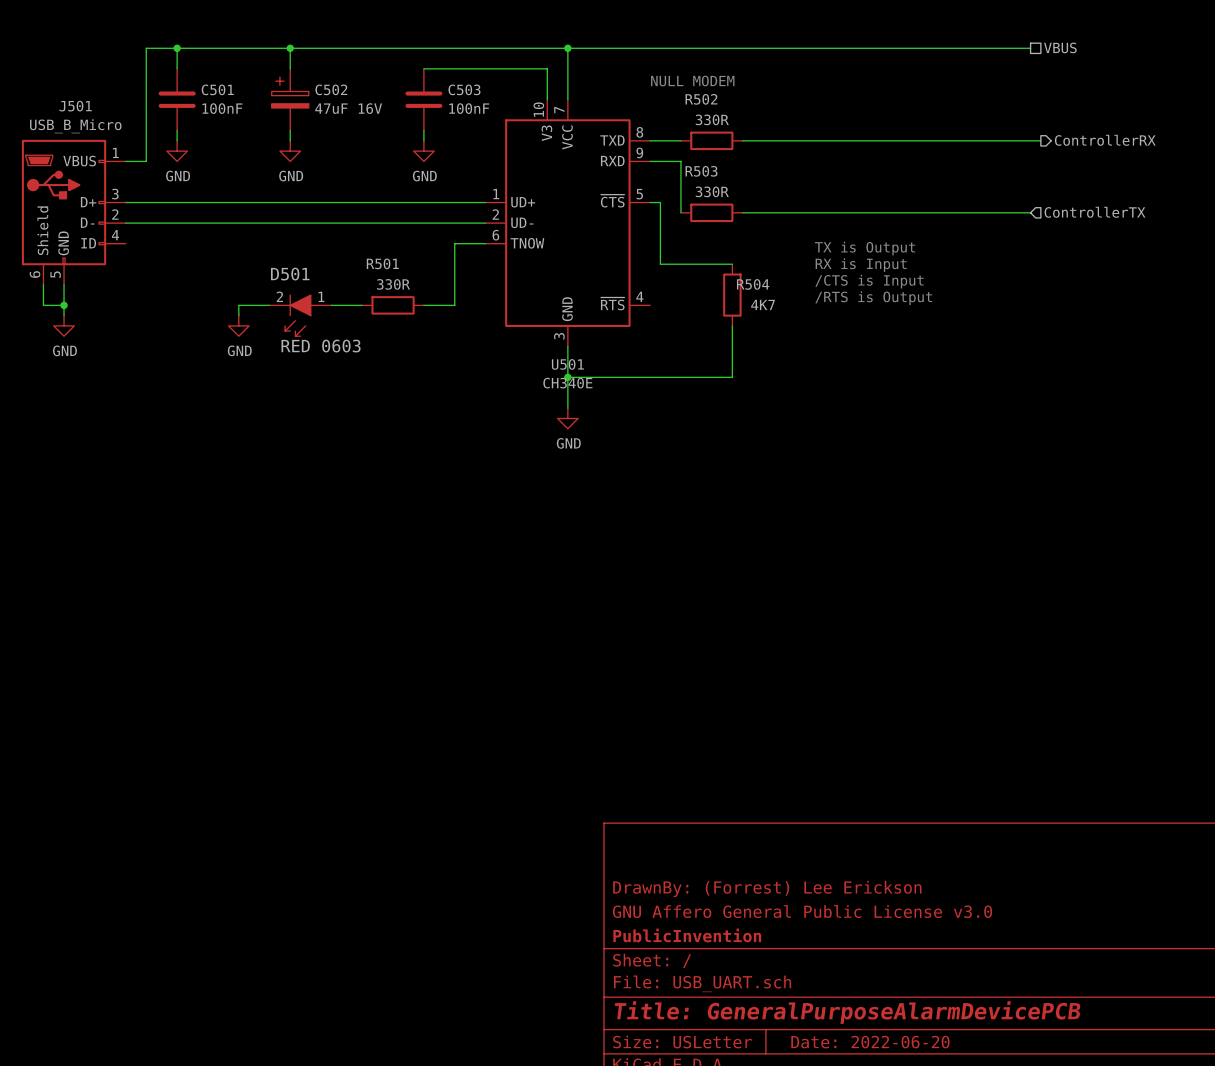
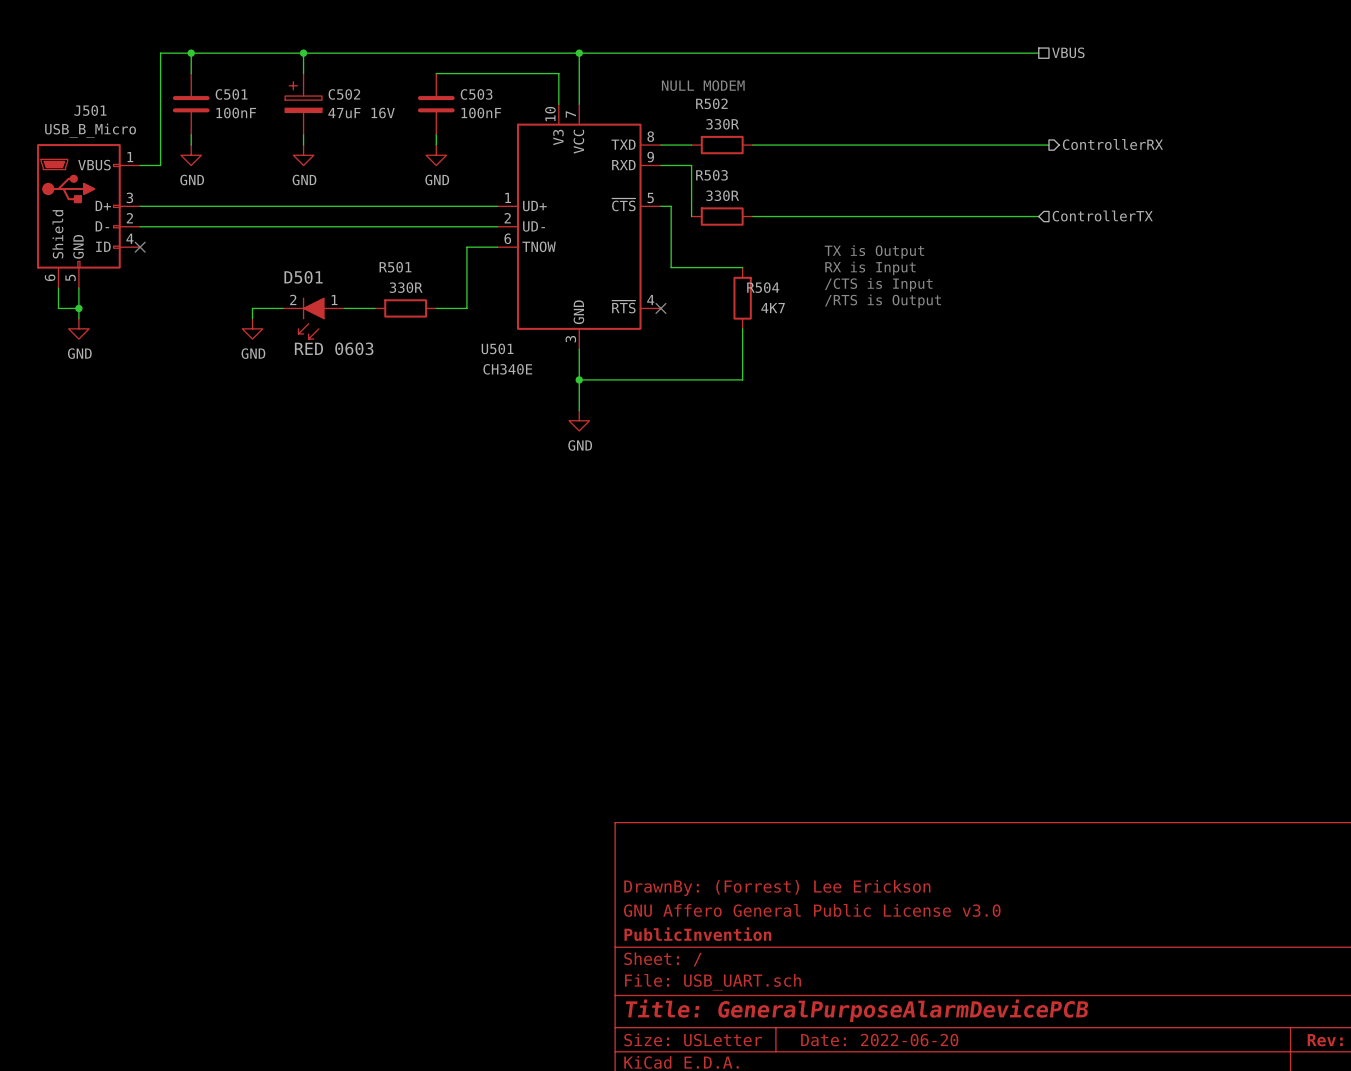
no-connect mark: none -> (140, 247)
no-connect mark: none -> (660, 308)
U501 name position: U501 (567, 364) -> U501 (497, 348)
U501 value position: CH340E (567, 383) -> CH340E (507, 369)

